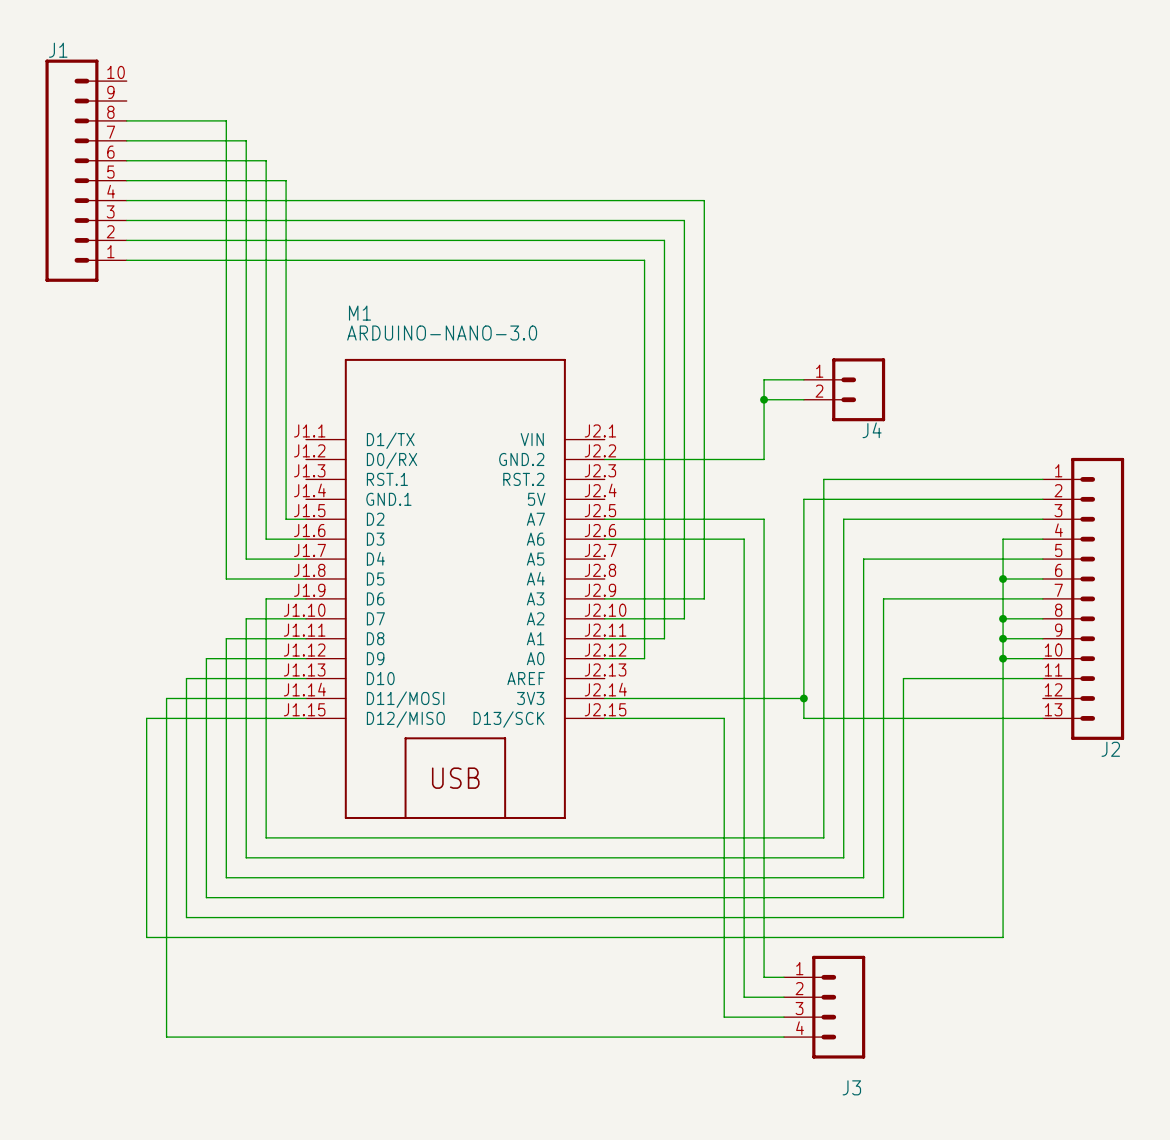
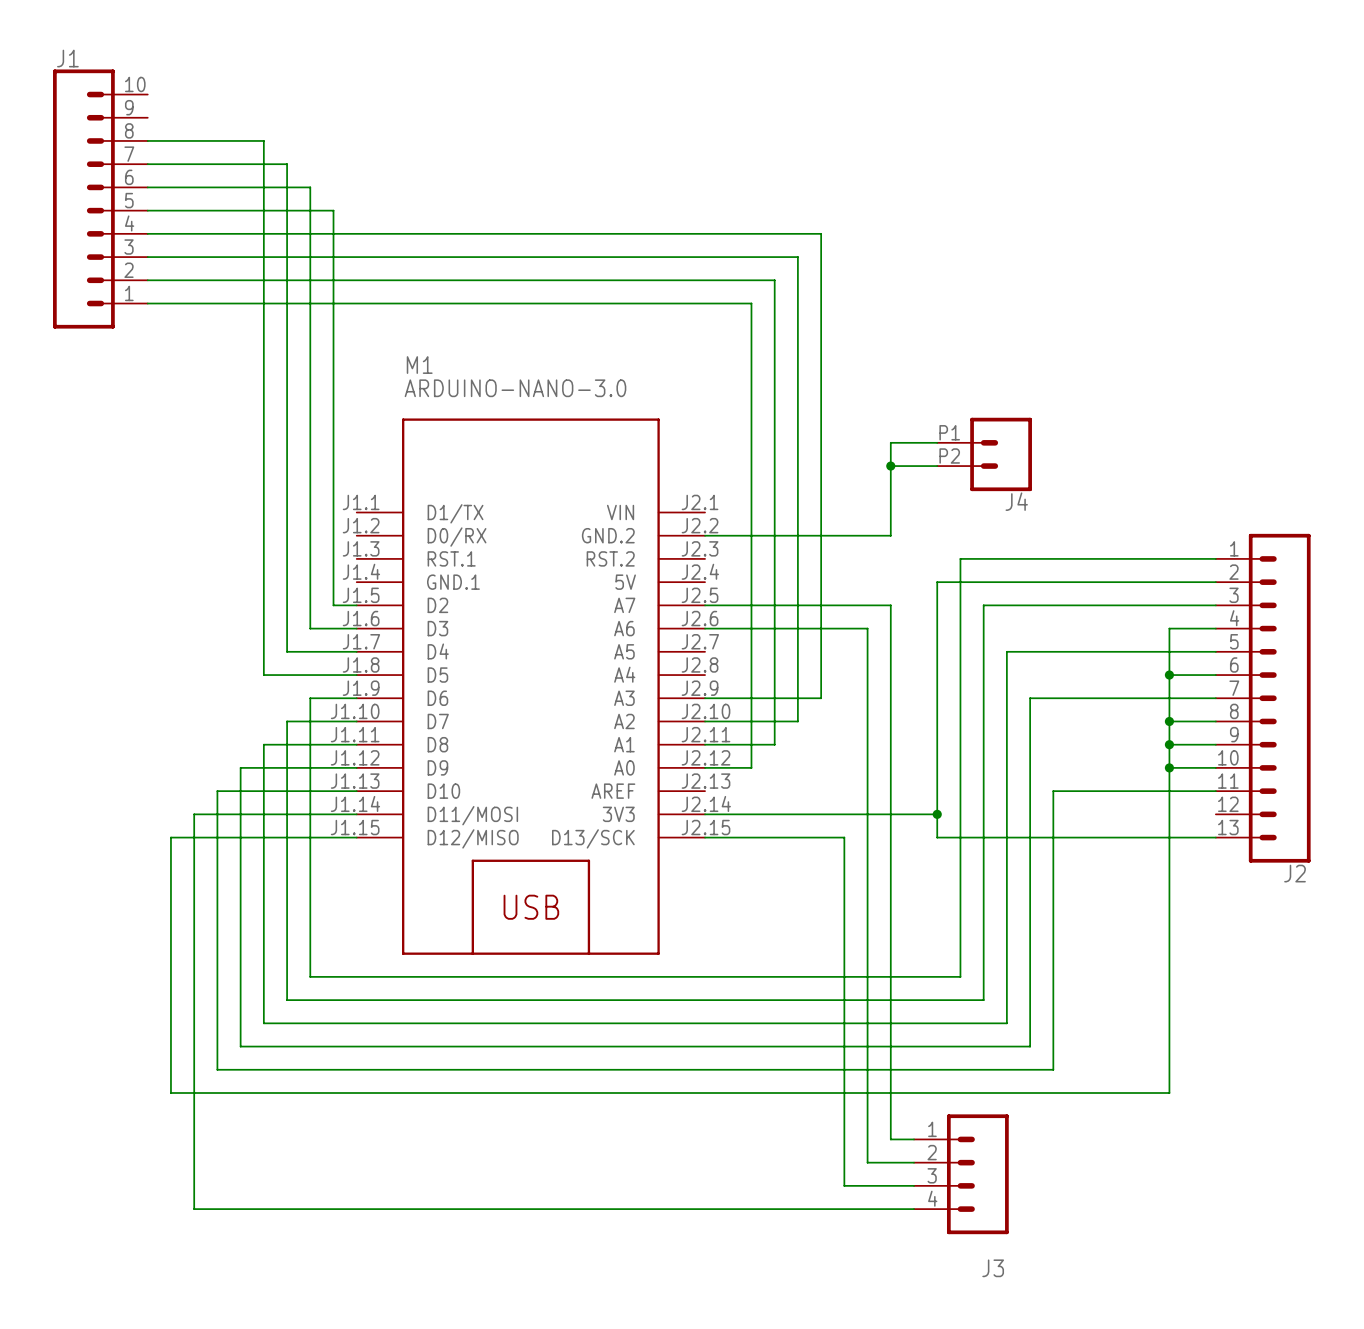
J4 pin number: 1 (819, 371) -> P1 (949, 432)
J4 pin number: 2 (819, 391) -> P2 (949, 456)

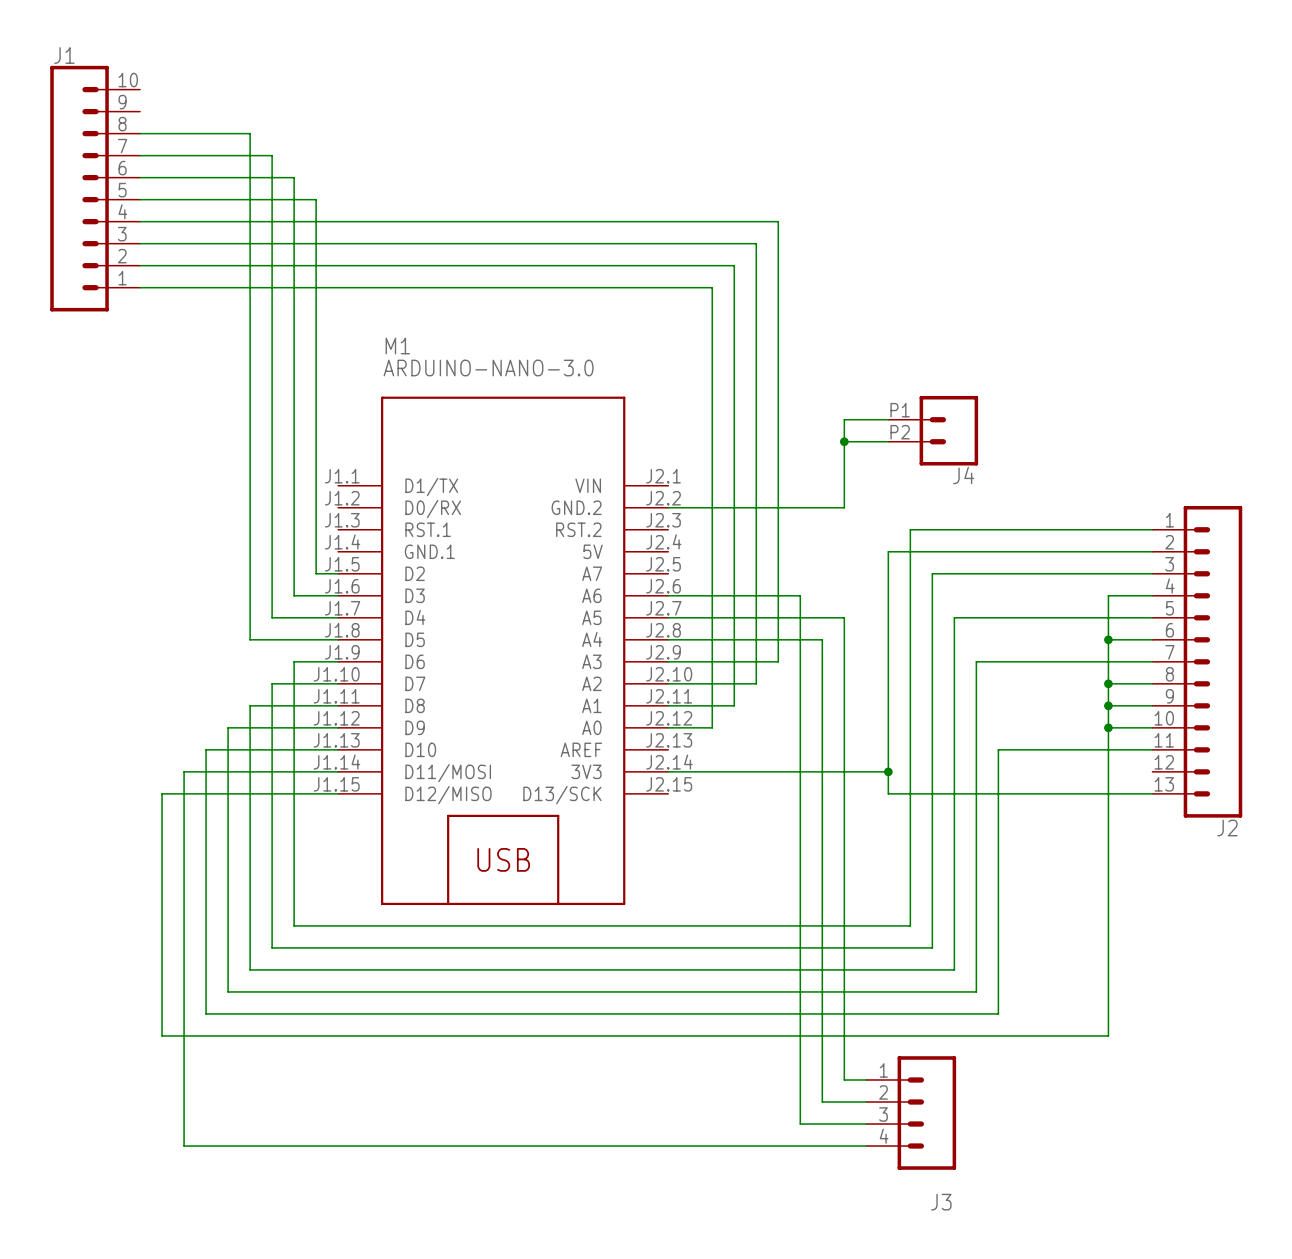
wire: (705, 605) (890, 605) (890, 651) -> (668, 617) (844, 617)
wire: (844, 628) (867, 628) (867, 675) -> (668, 639) (822, 639)
wire: (705, 837) (844, 837) -> (800, 595) (800, 793)

